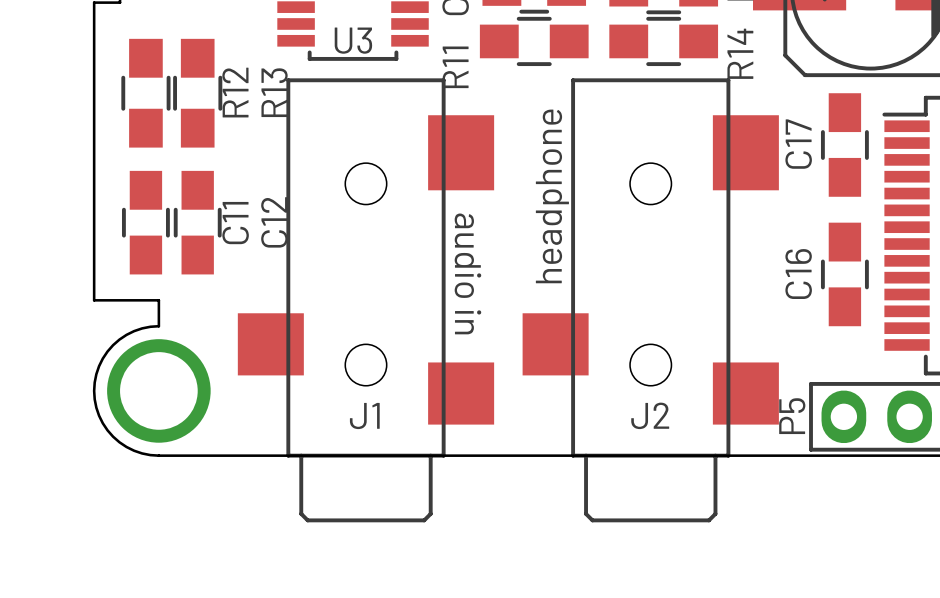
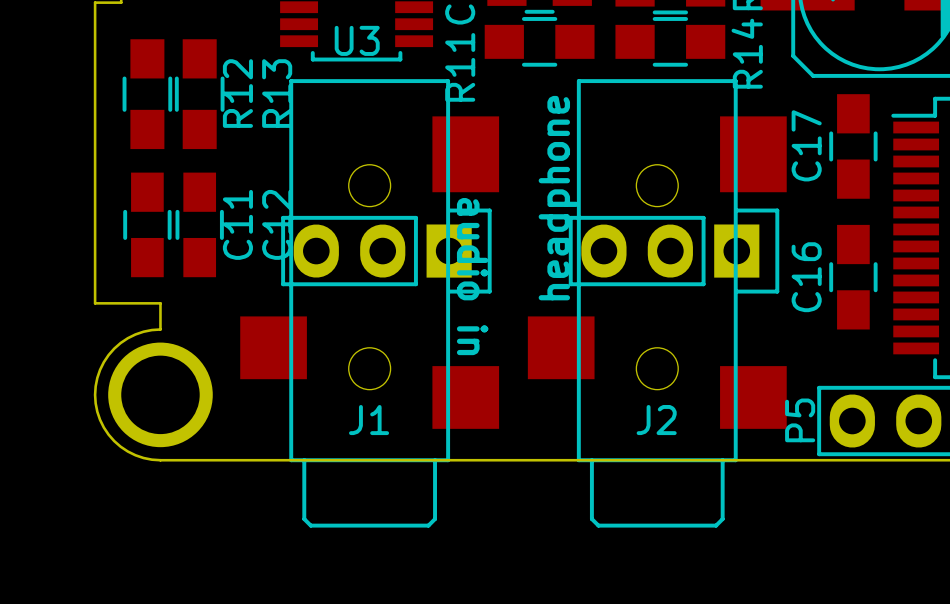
part: none -> (386, 251)
part: none -> (674, 251)

